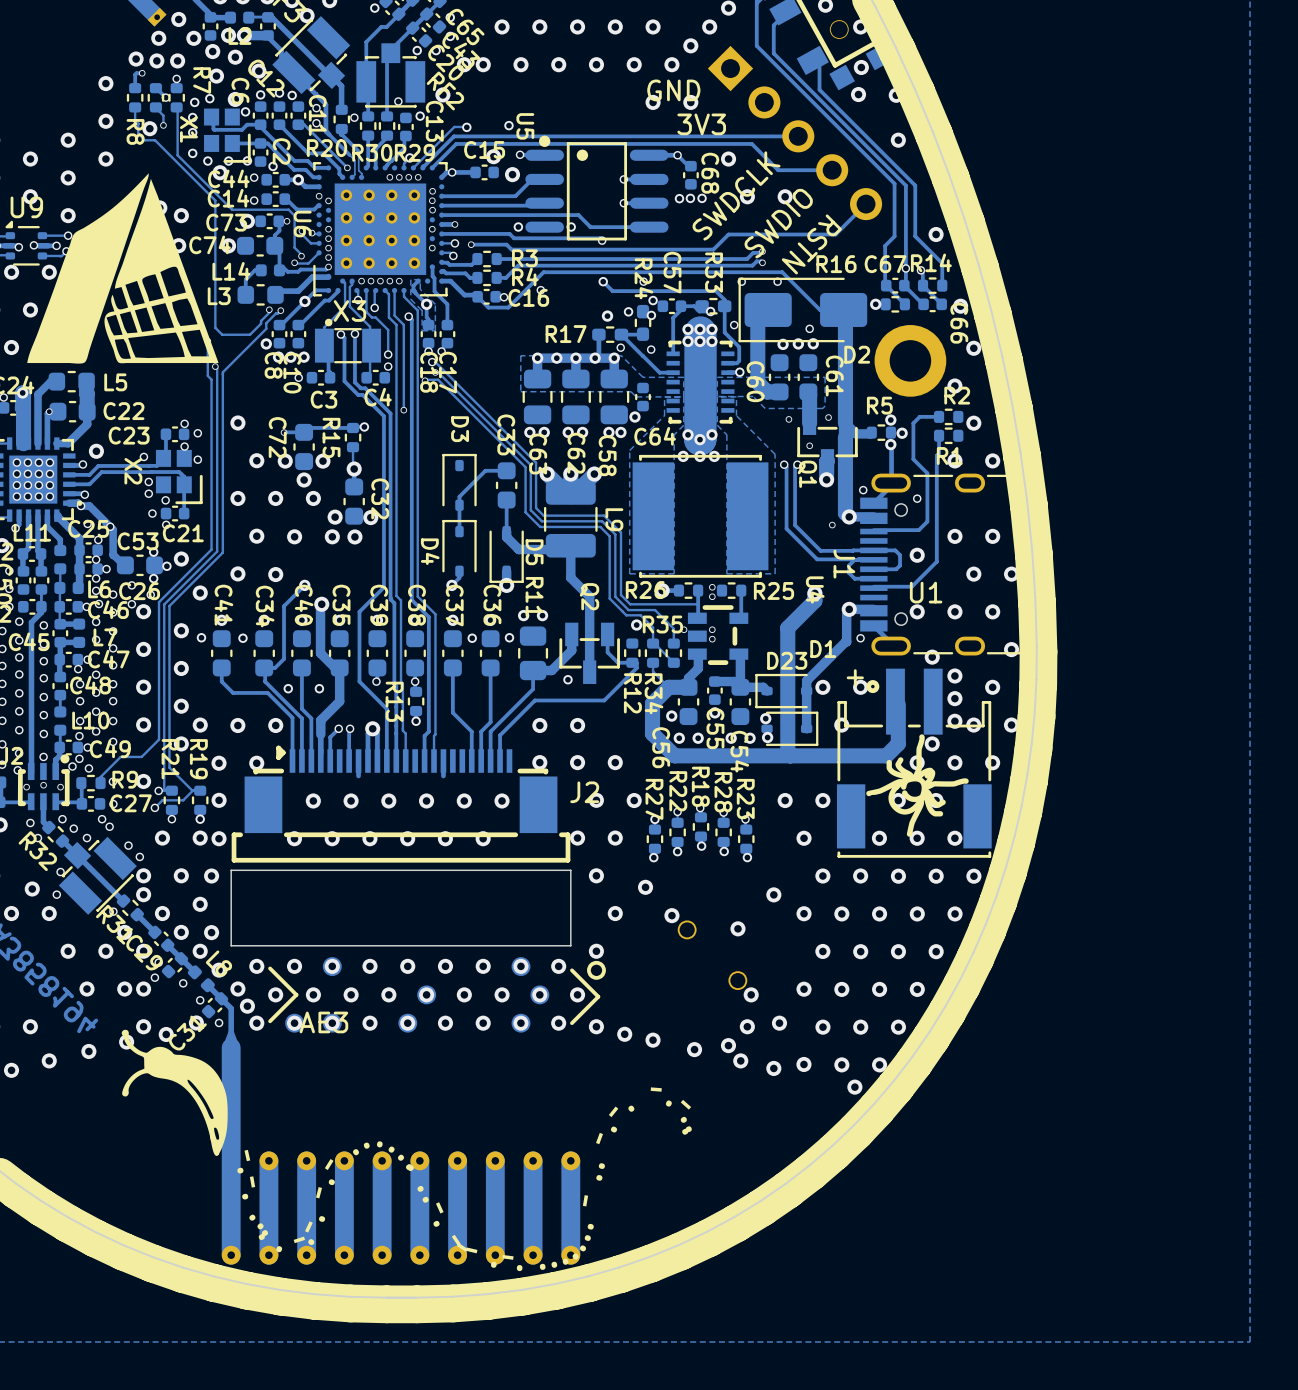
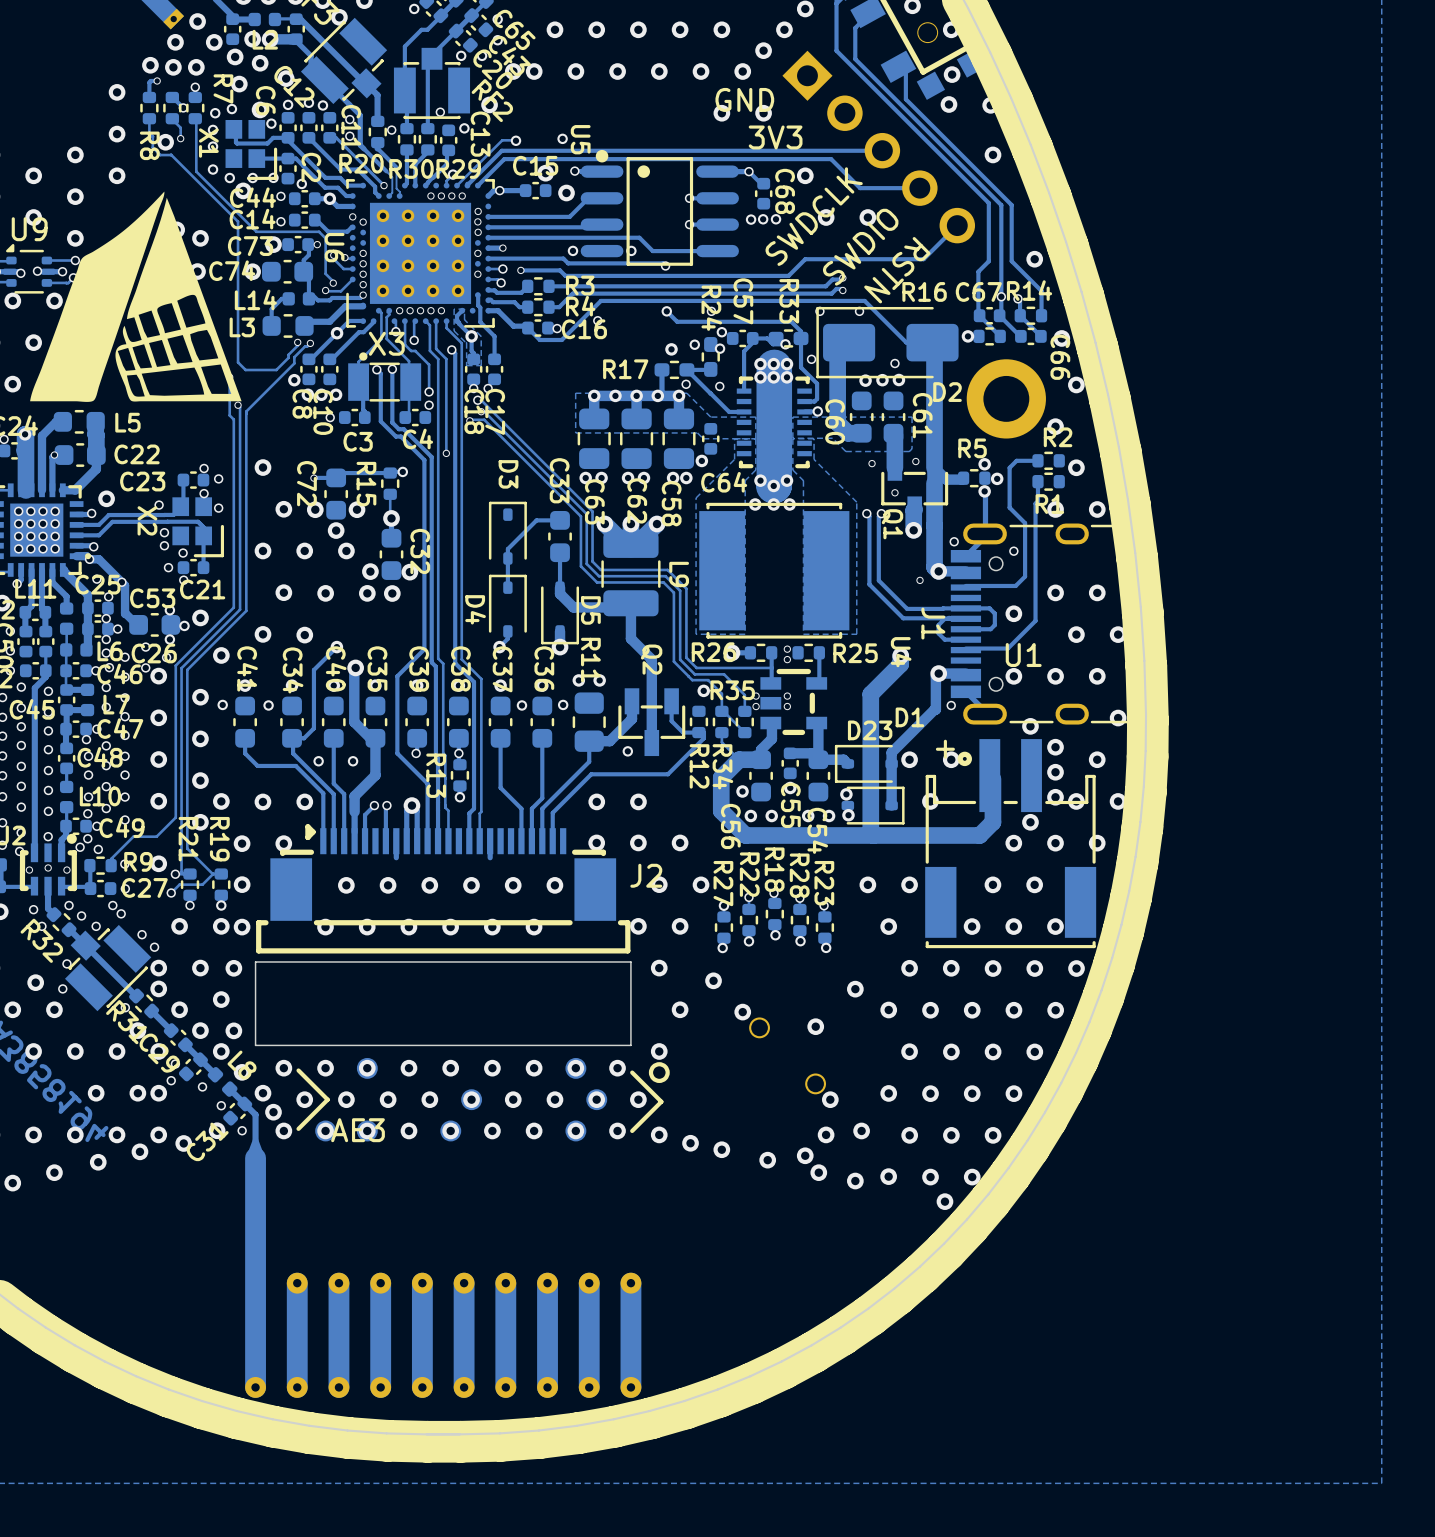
via: none -> (756, 706)
drawing: [866, 734, 969, 837] -> none
via: none -> (33, 1051)
via: none -> (75, 1134)
via: none -> (117, 1134)
drawing: [121, 1029, 692, 1272] -> none

